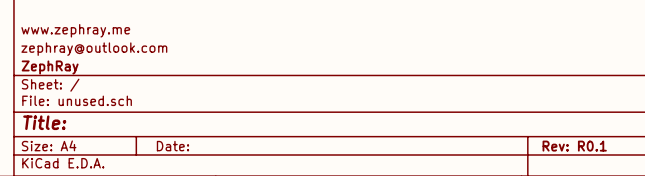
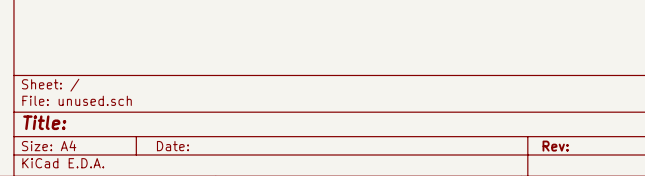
title block: www.zephray.me (75, 30) -> none
title block: zephray@outlook.com (94, 49) -> none
title block: ZephRay (50, 67) -> none
title block: Rev: R0.1 (574, 146) -> Rev: (555, 146)

